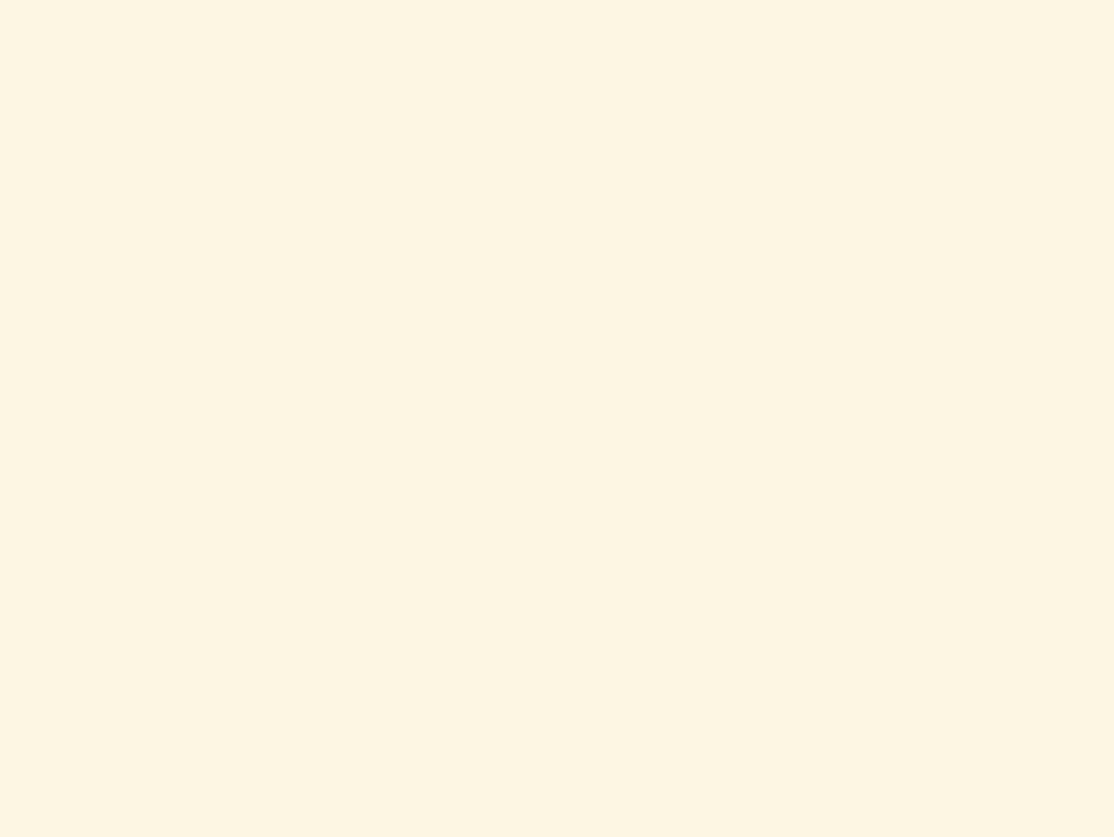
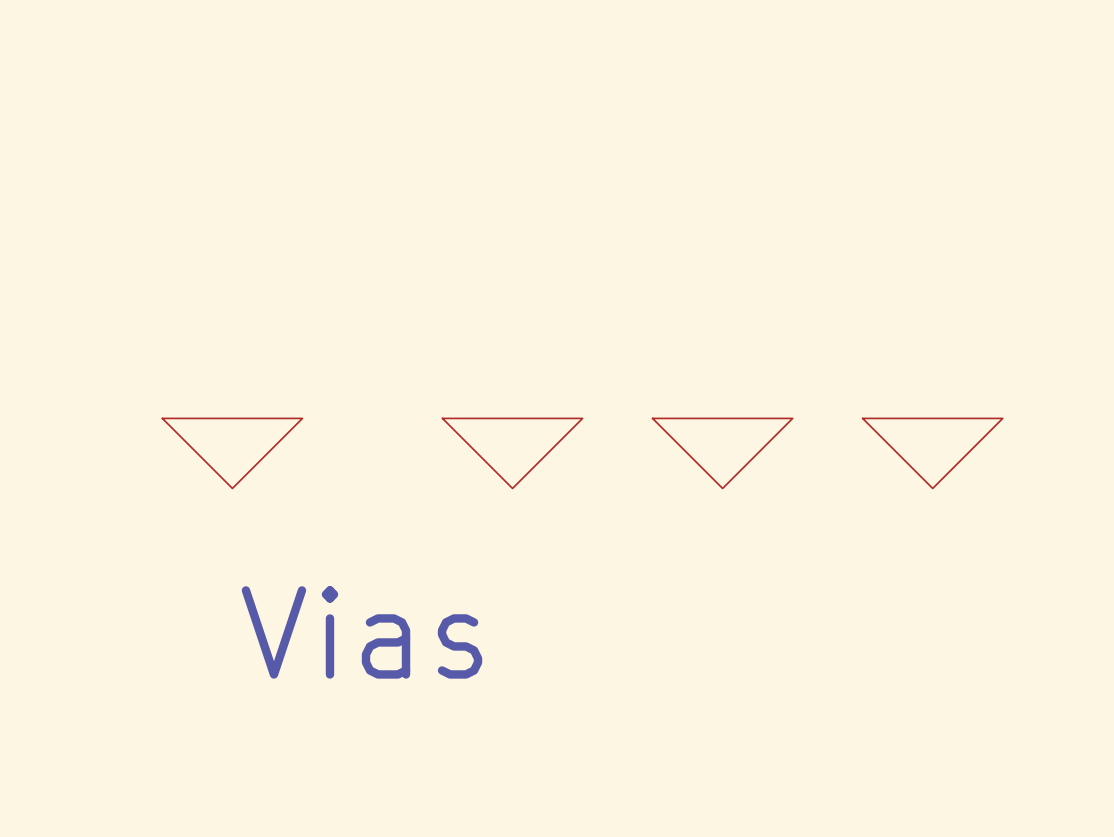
power symbol: none -> (232, 453)
power symbol: none -> (512, 453)
power symbol: none -> (722, 453)
power symbol: none -> (932, 453)
text: none -> Vias (361, 632)

